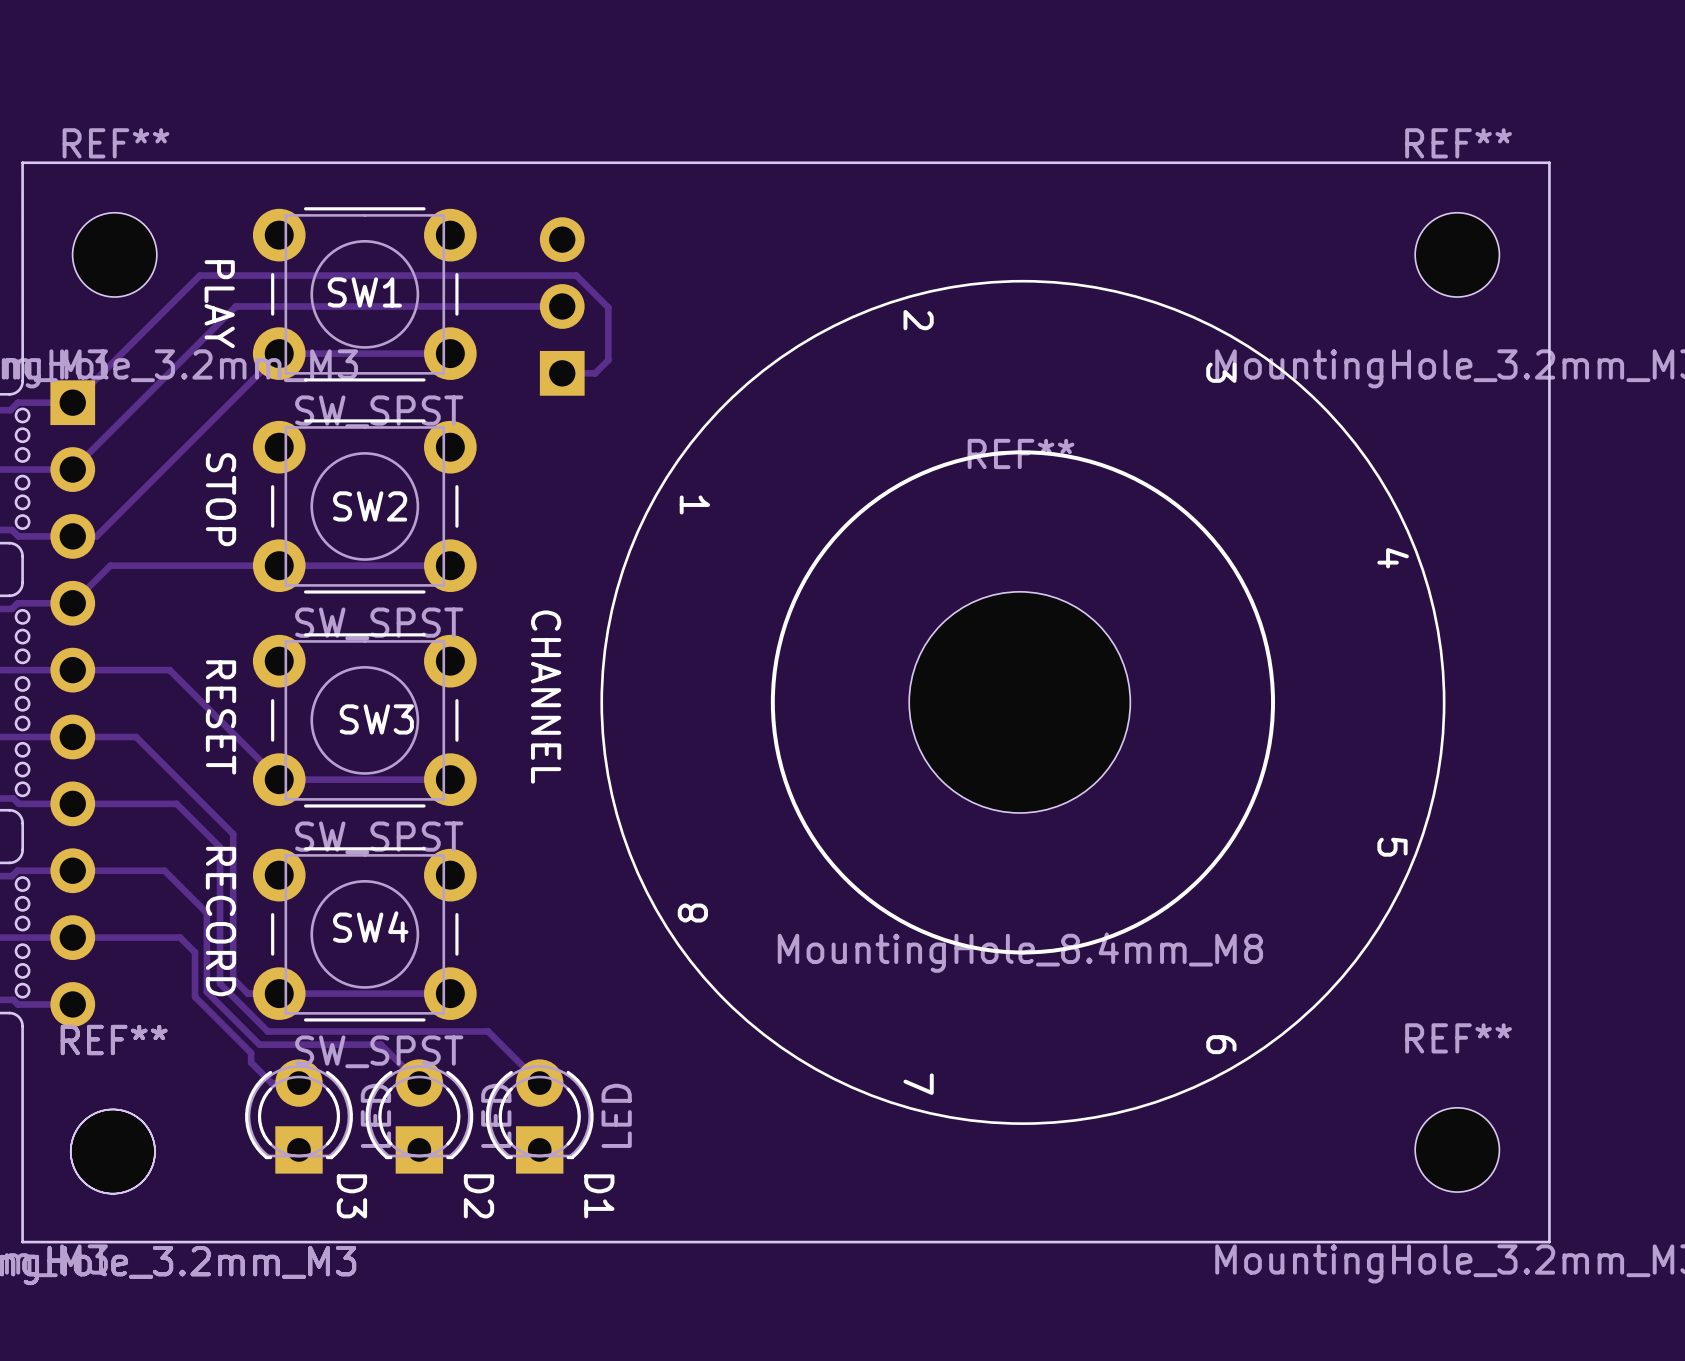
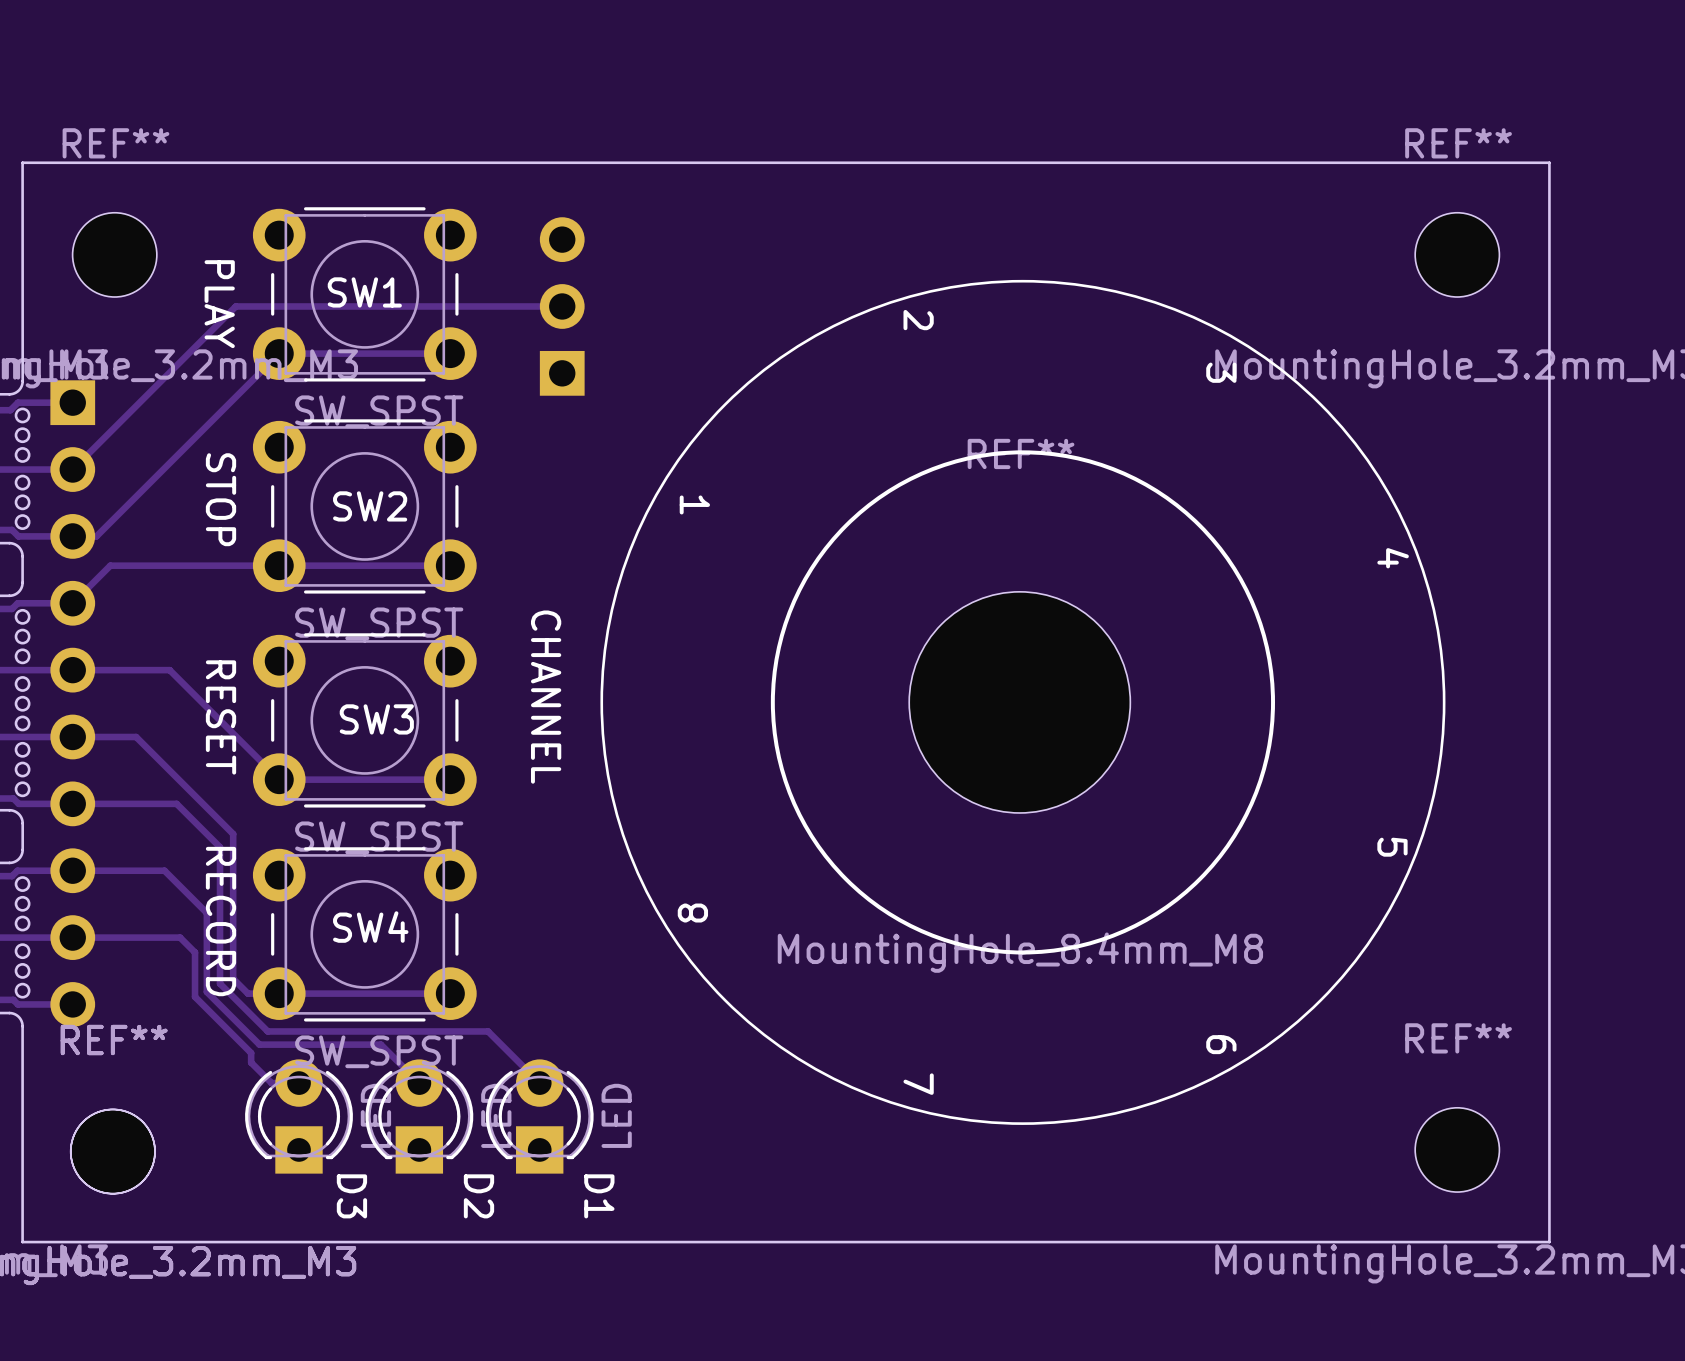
track: (562, 373) (595, 373) (608, 360) (608, 307) (576, 275) (199, 275) (72, 402) -> none

